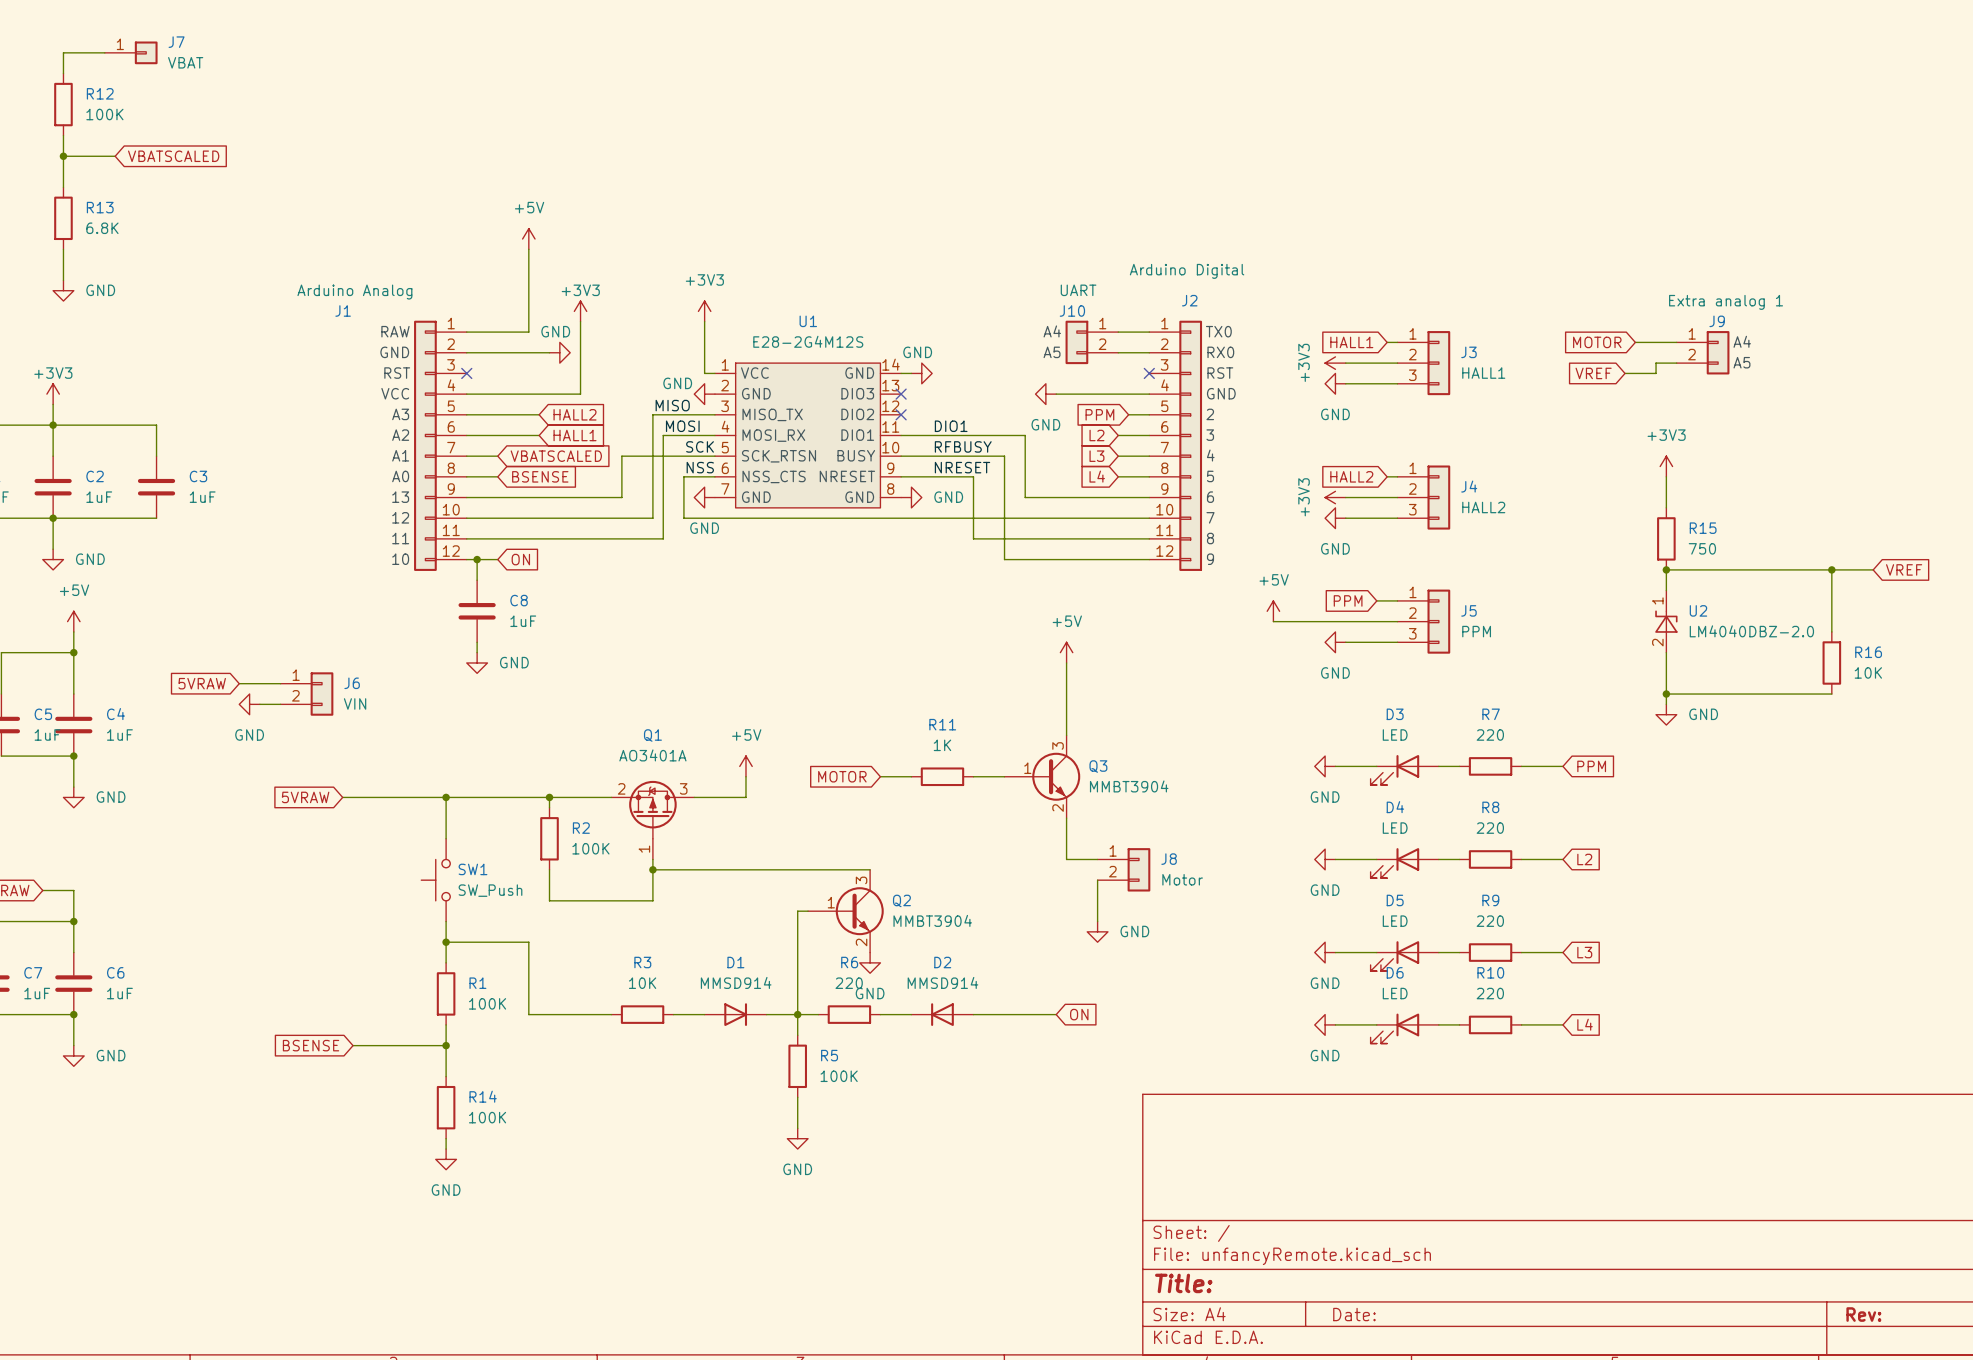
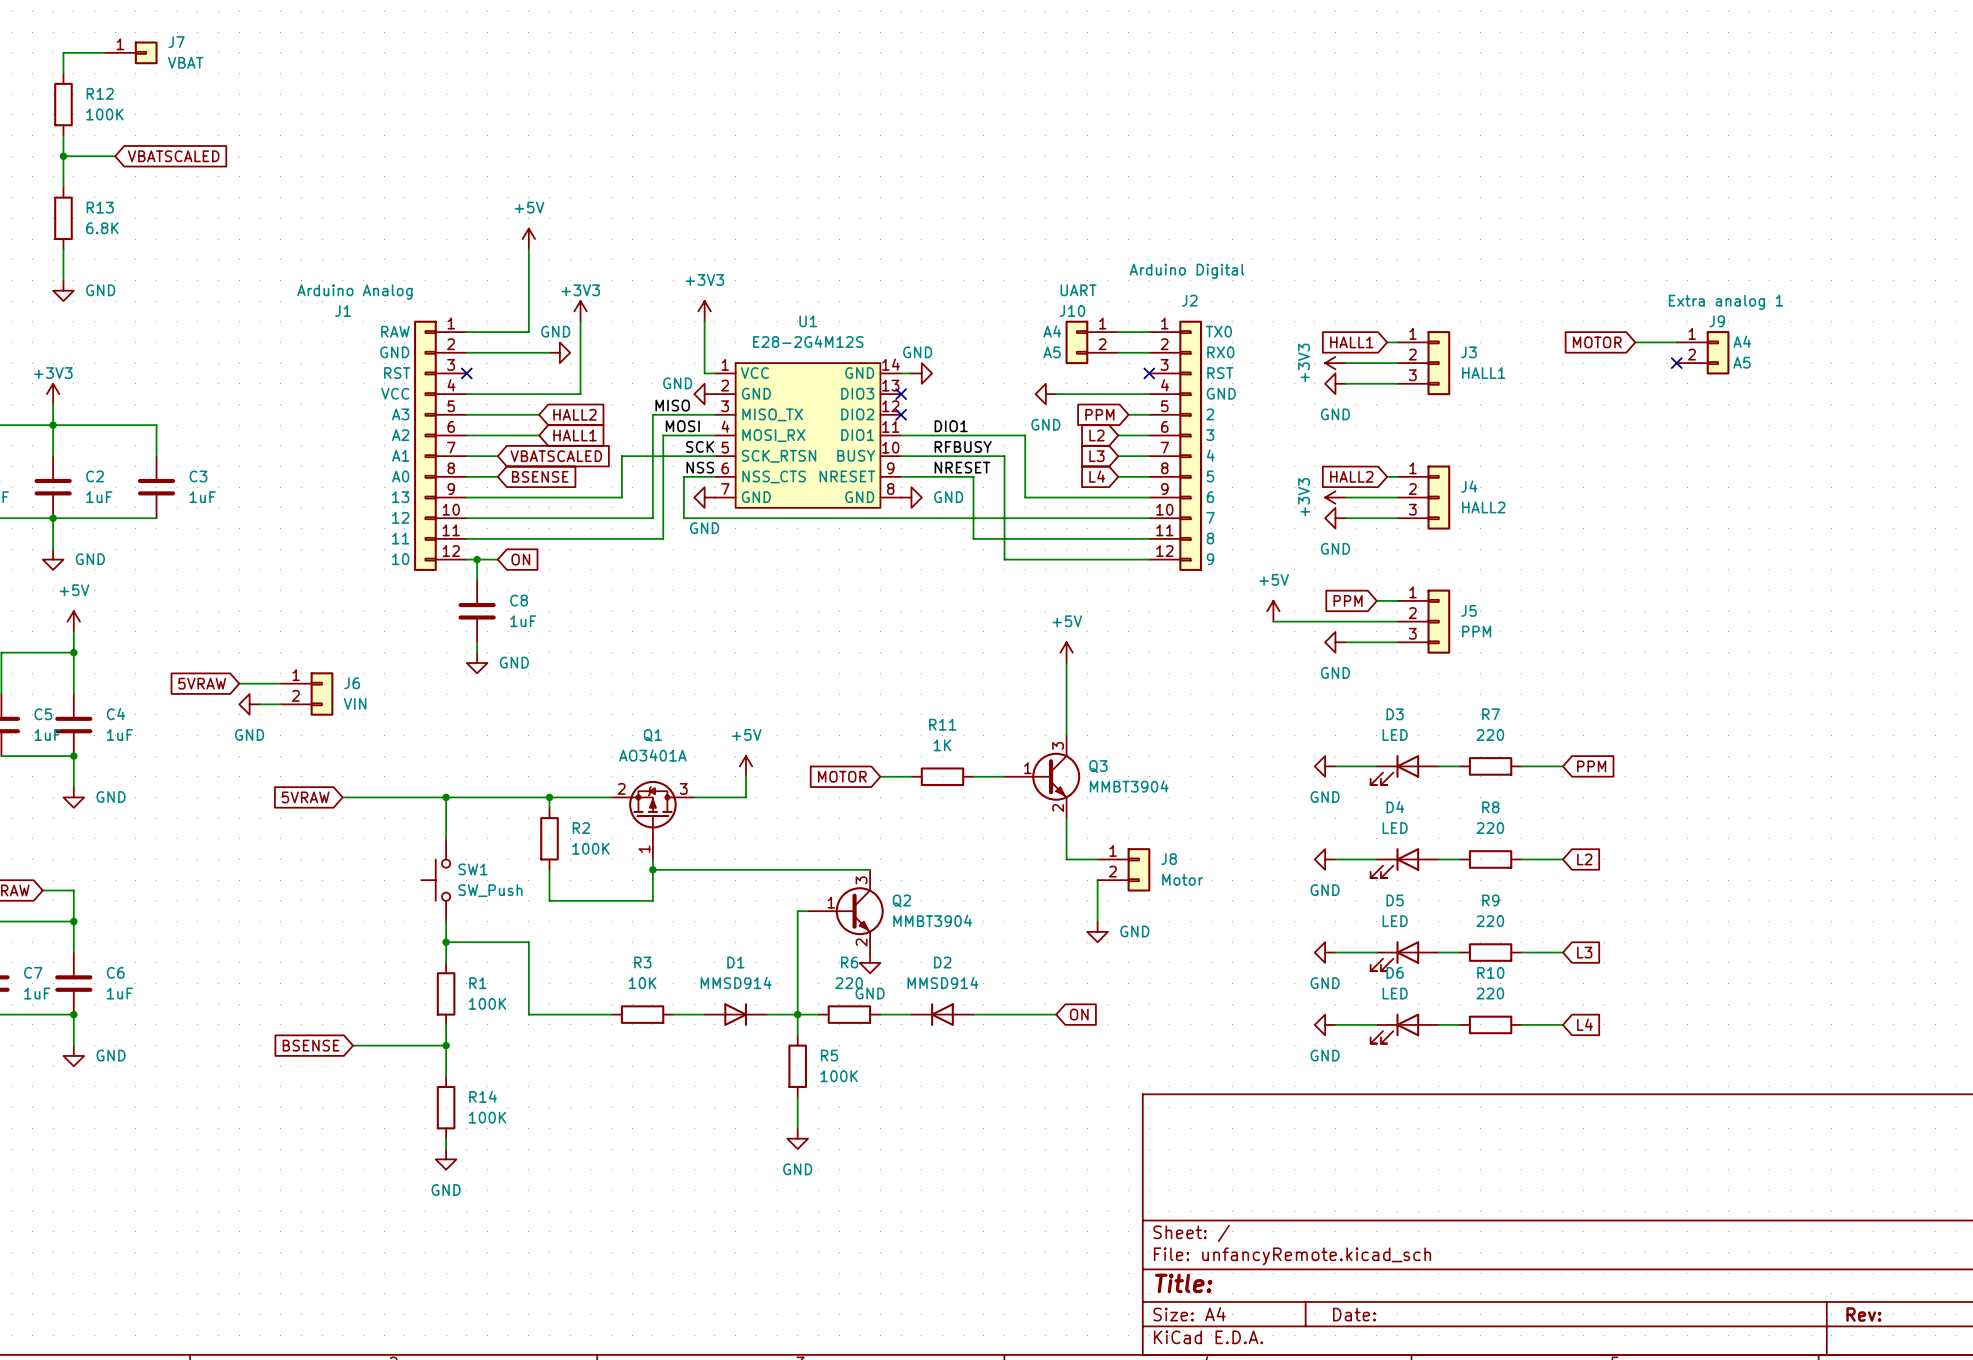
wire: (1676, 363) (1656, 363) (1656, 373) (1625, 373) -> none
no-connect mark: none -> (1676, 363)
global label: VREF (1593, 373) -> none
power symbol: +3V3 (1666, 466) -> none
wire: (1666, 476) (1666, 507) -> none
R15: 750 (1666, 538) -> none
junction: (1666, 569) -> none
wire: (1831, 569) (1831, 631) -> none
junction: (1831, 569) -> none
wire: (1873, 569) (1666, 569) (1666, 590) -> none
global label: VREF (1904, 569) -> none
U2: LM4040DBZ-2.0 (1666, 621) -> none
wire: (1666, 652) (1666, 704) -> none
R16: 10K (1831, 662) -> none
wire: (1666, 694) (1831, 694) -> none
junction: (1666, 694) -> none
power symbol: GND (1666, 714) -> none

